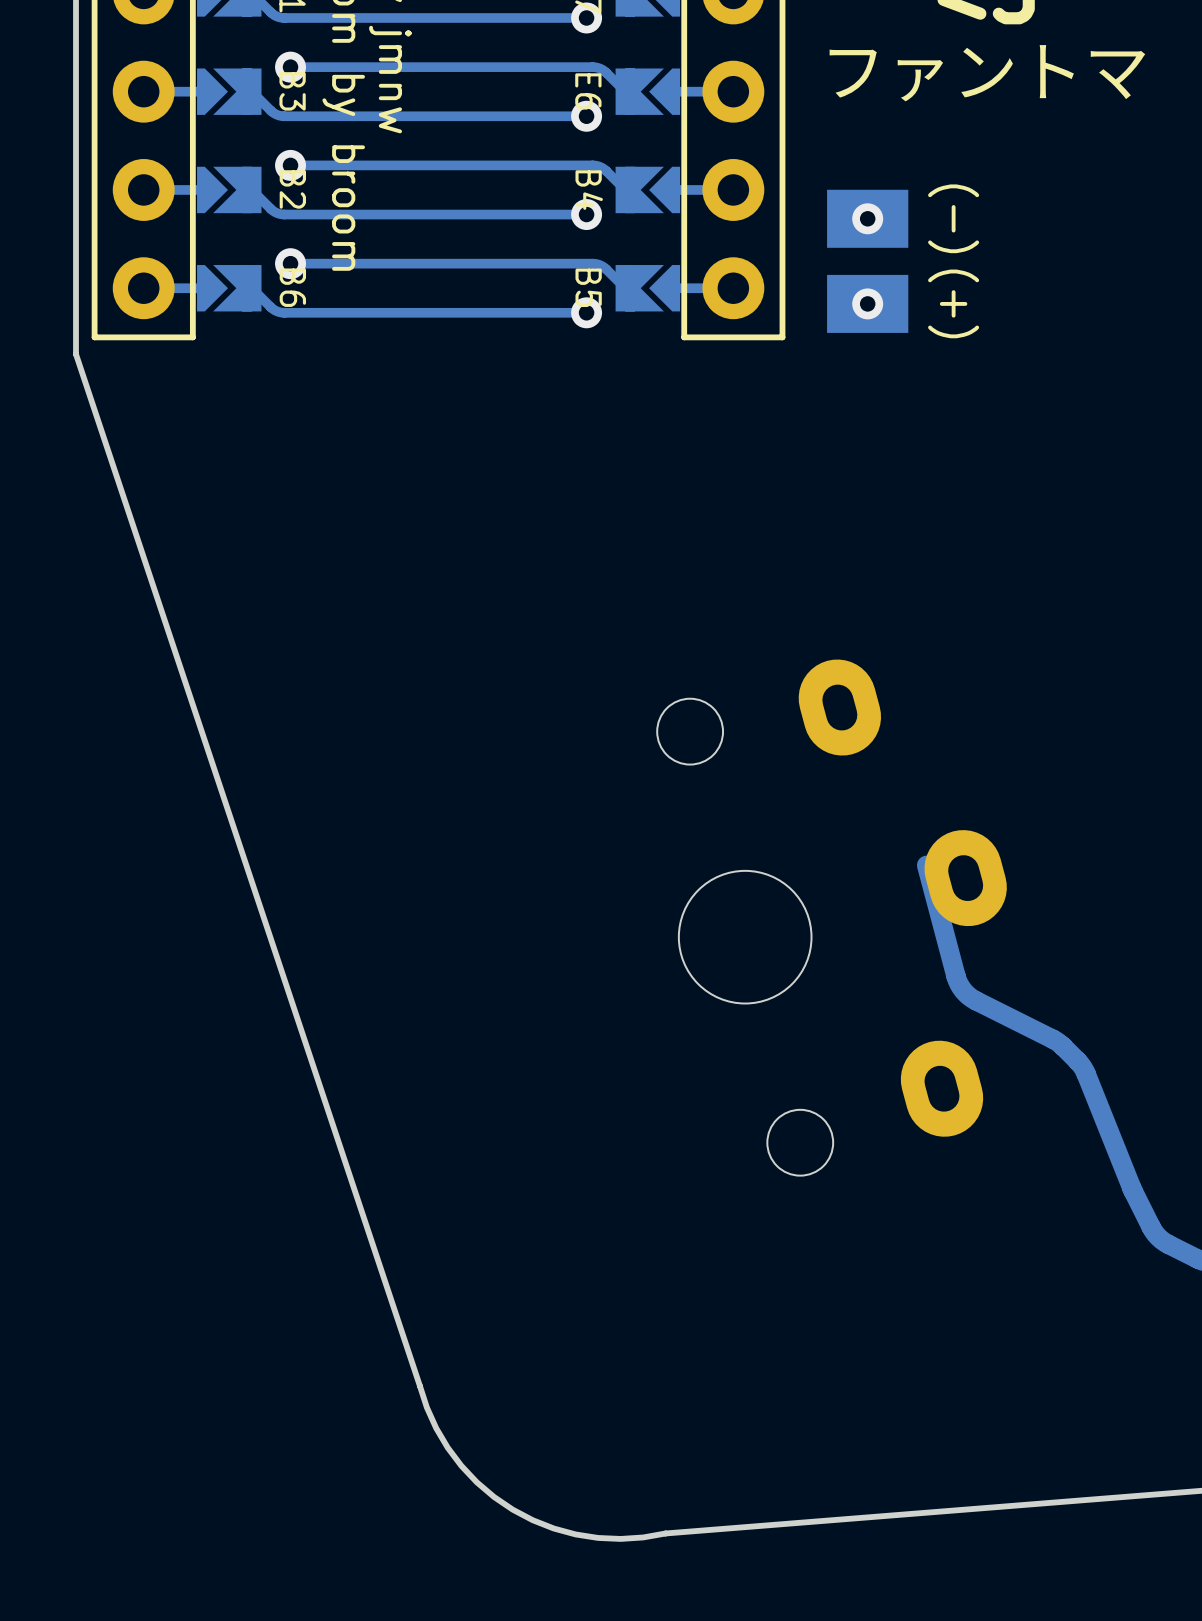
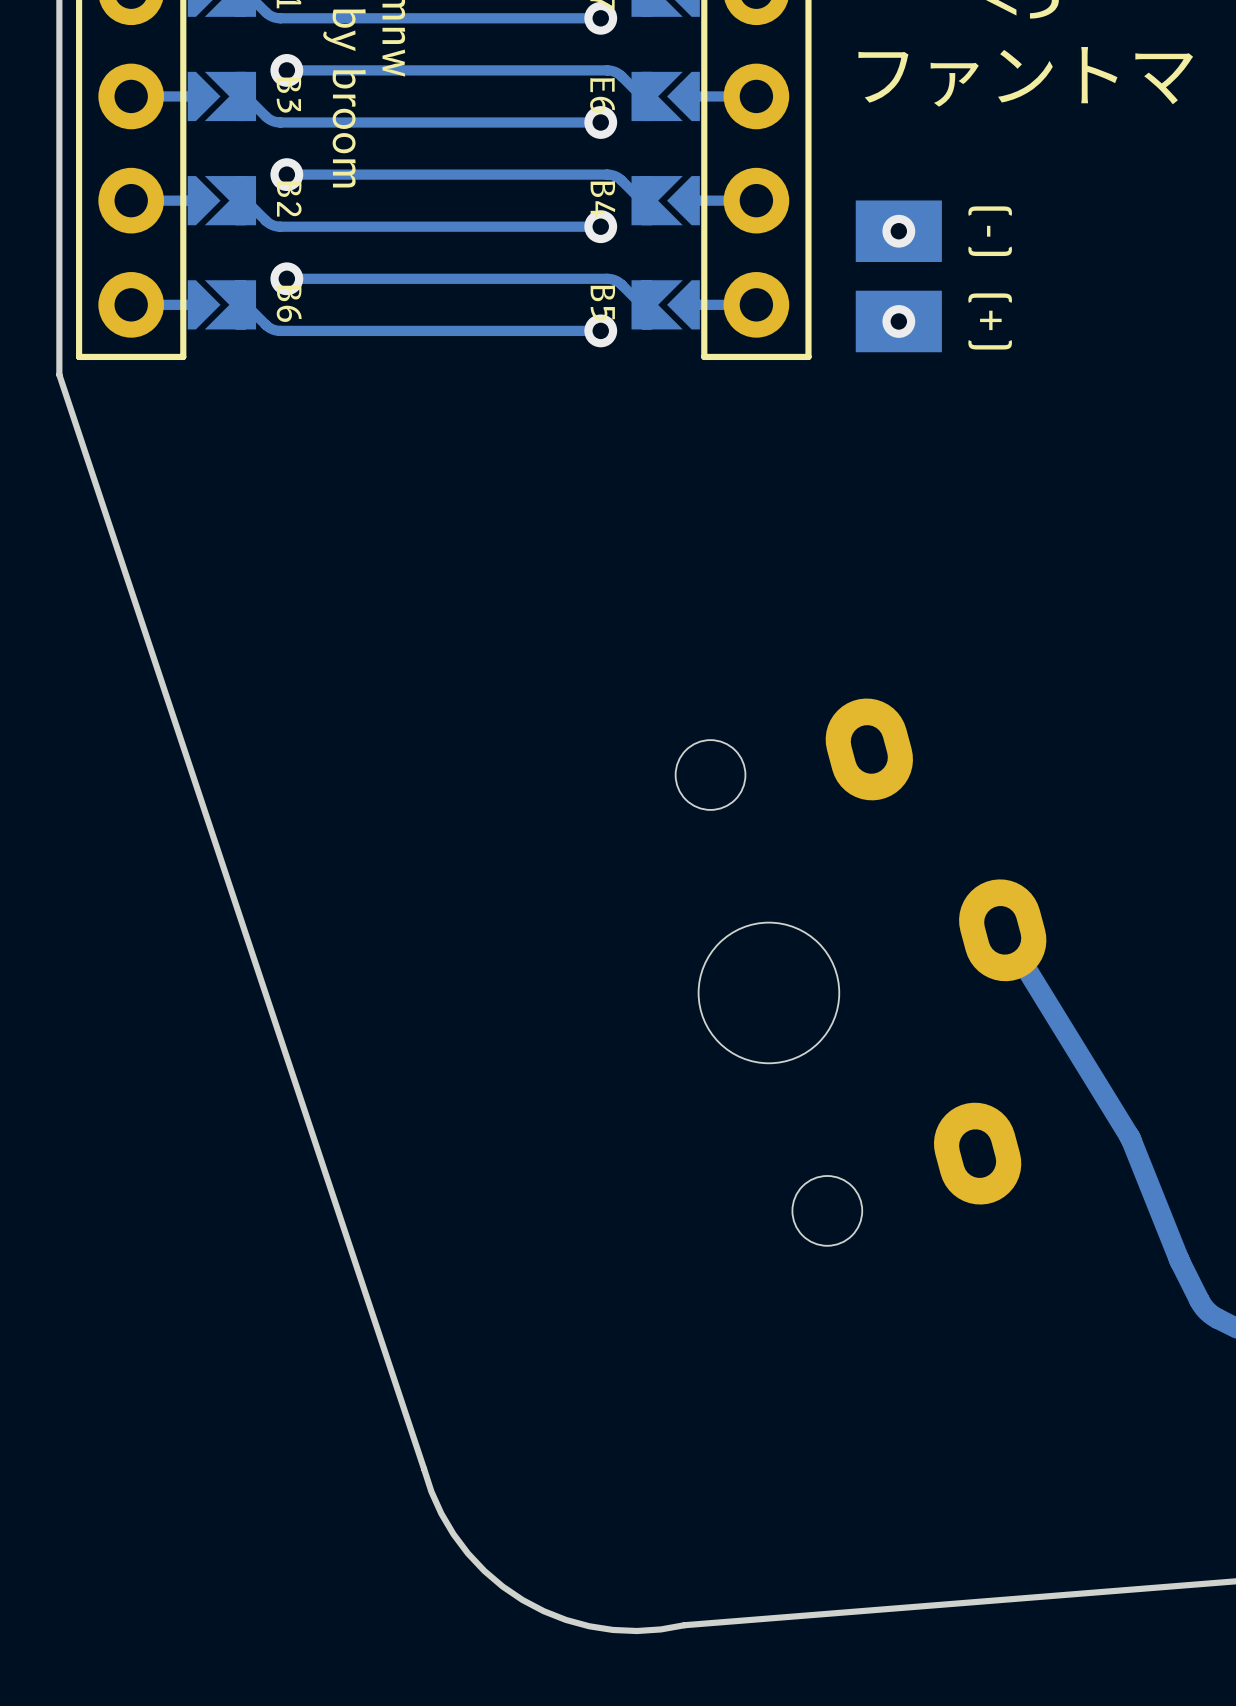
track: (926, 865) (955, 976) (963, 990) (976, 1000) (1058, 1042) (1080, 1063) (1086, 1075) -> (1002, 930) (1131, 1140)

